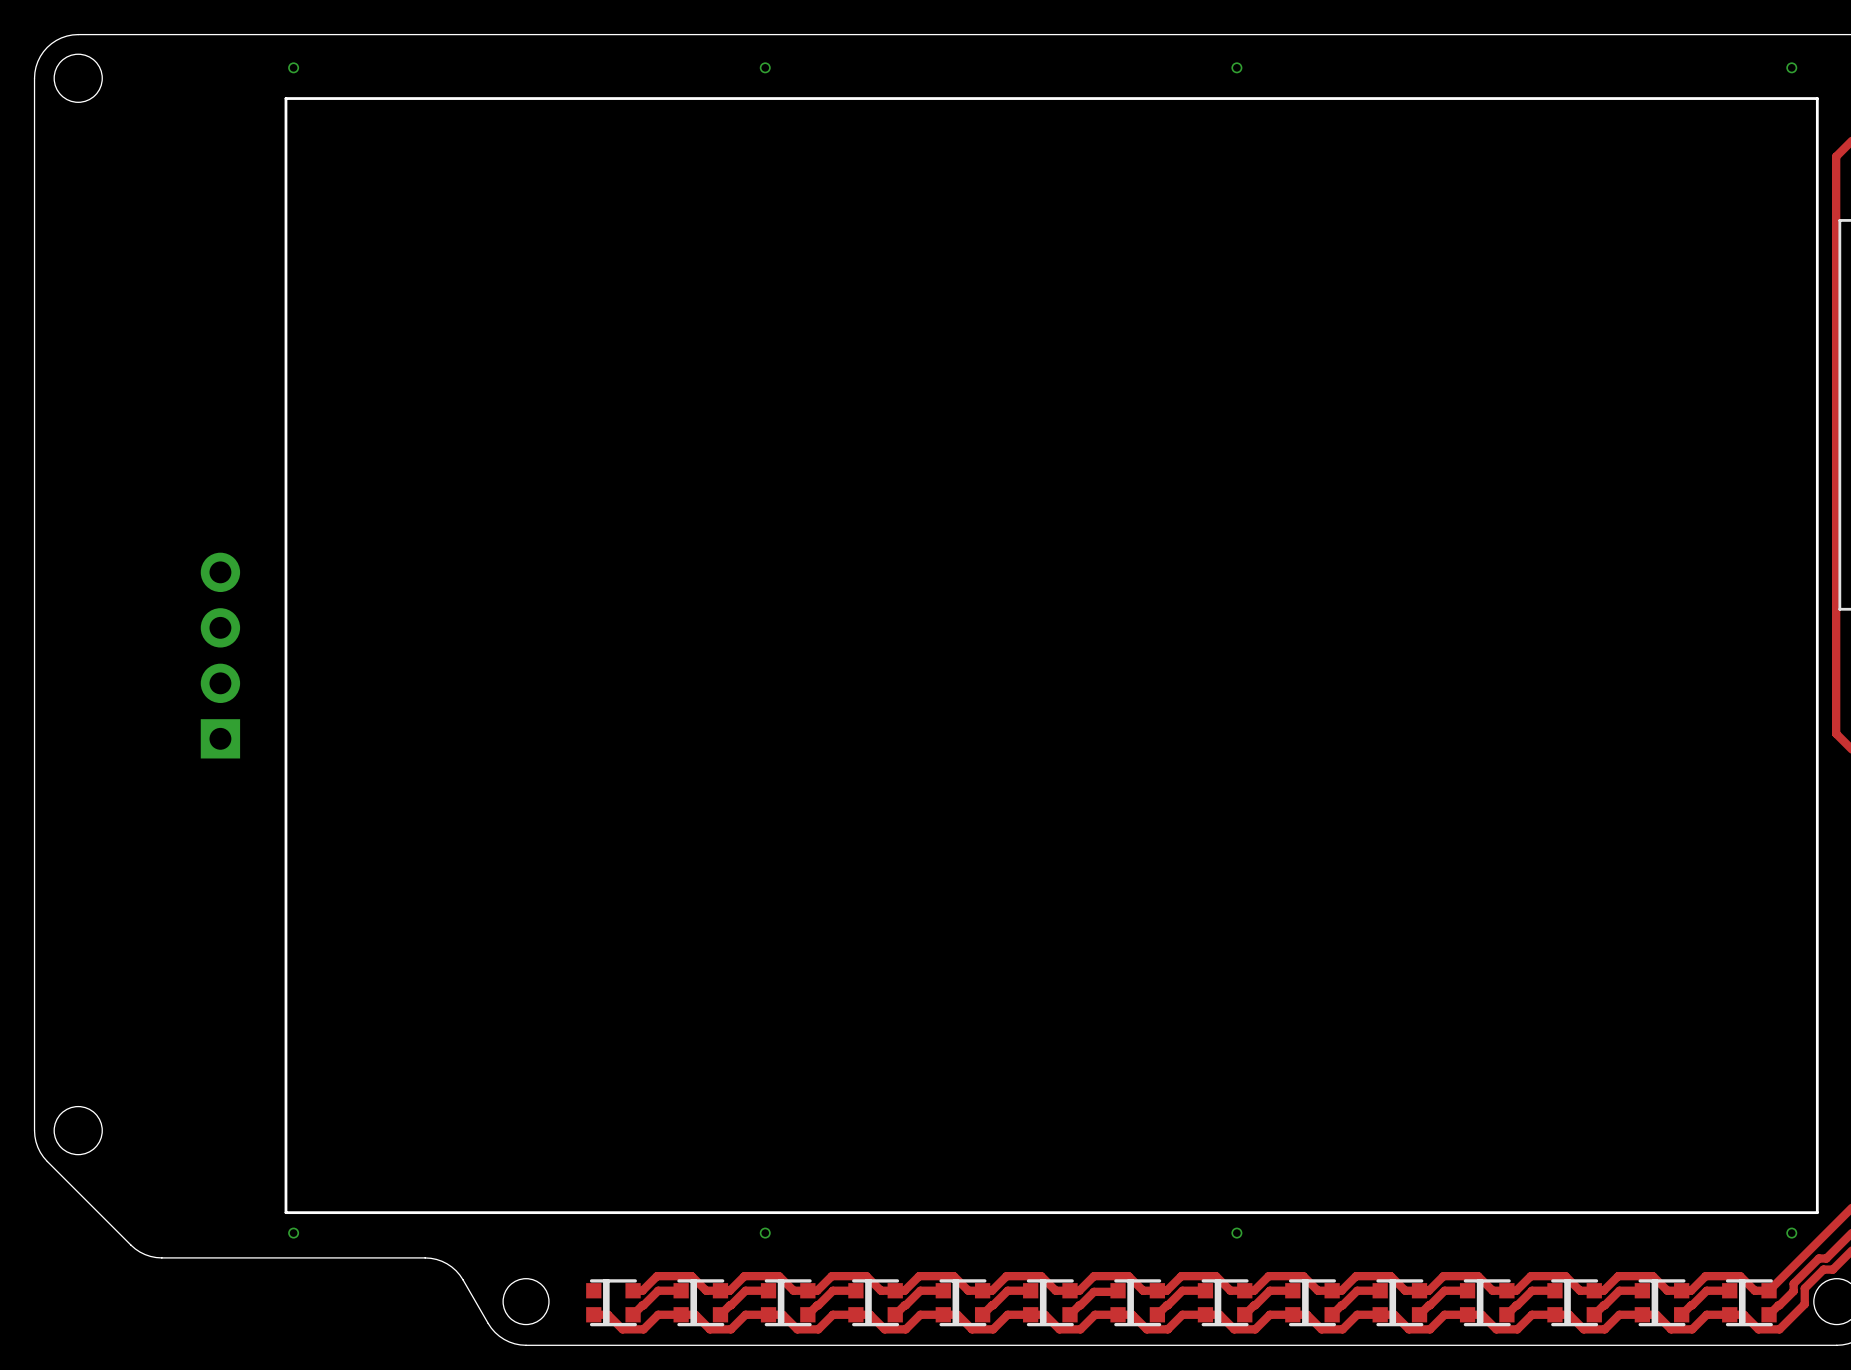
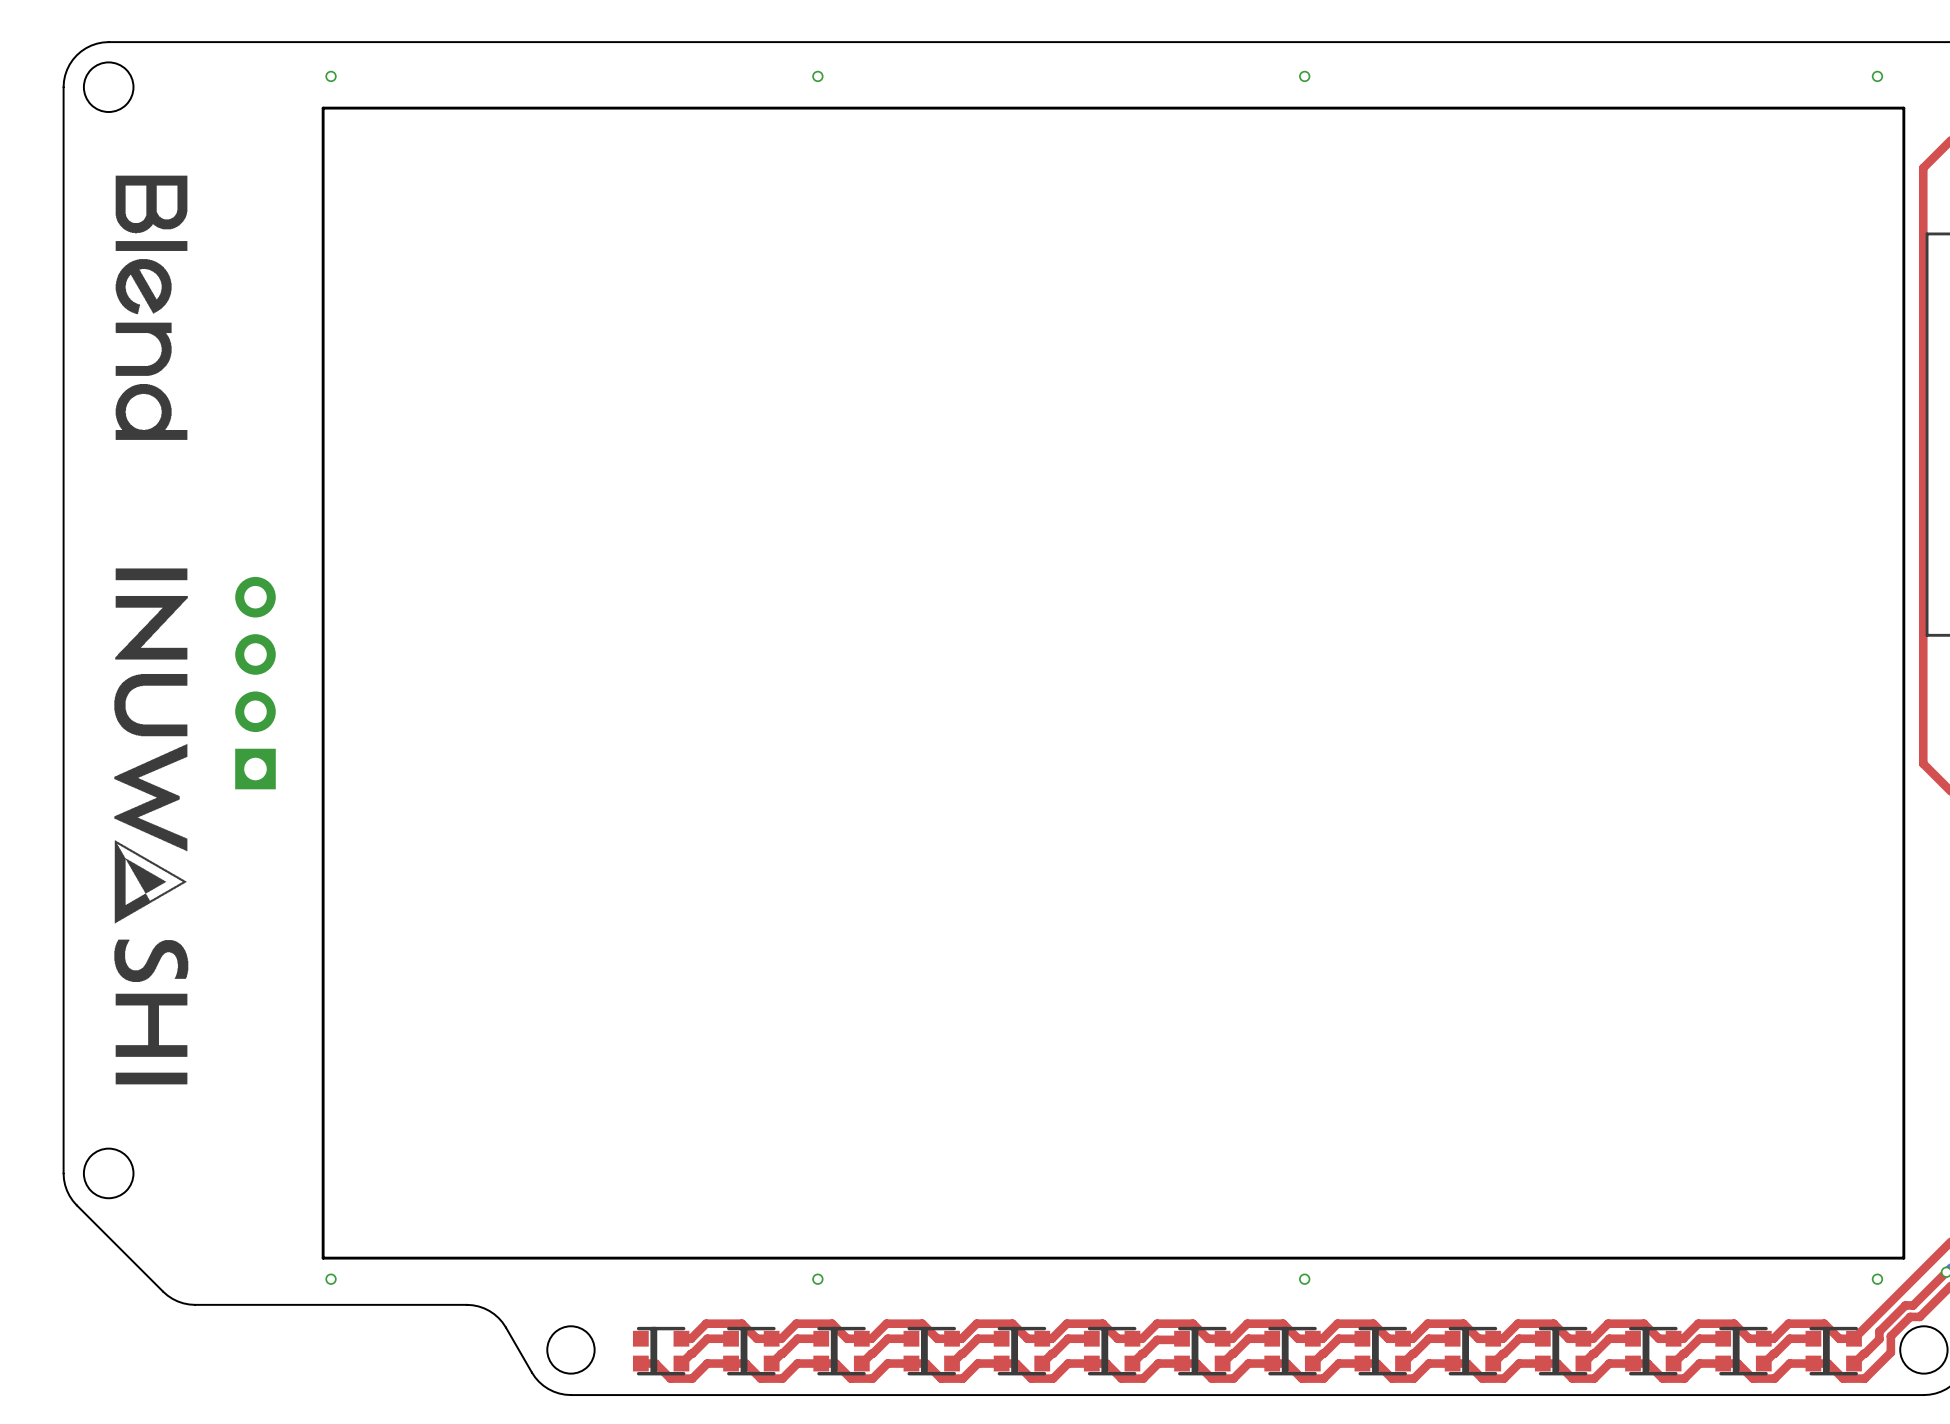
drawing: none -> [115, 175, 188, 440]
drawing: none -> [114, 568, 189, 1085]

